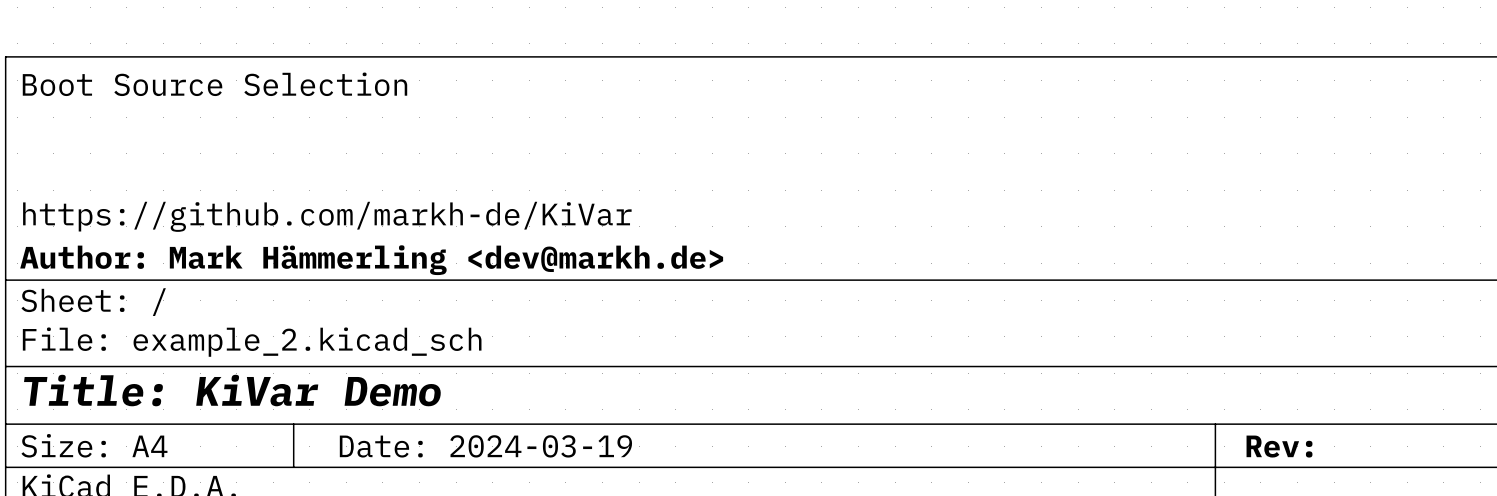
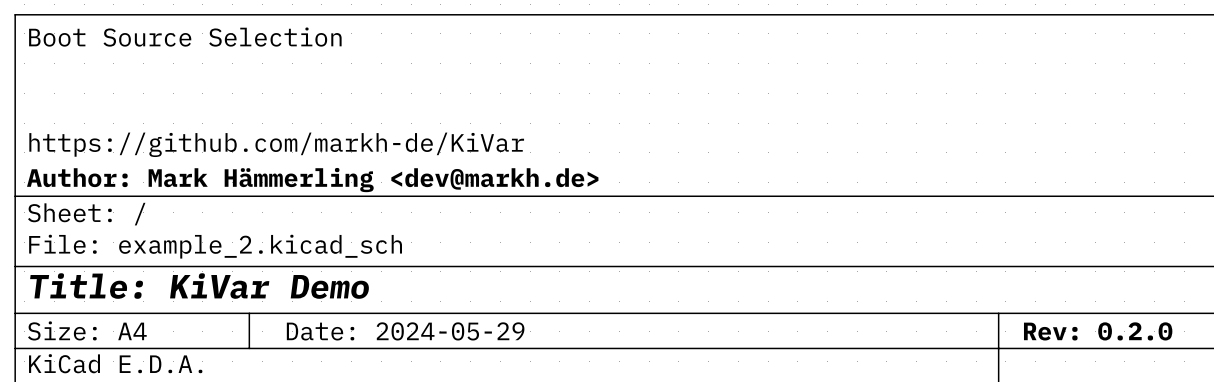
title block: Date: 2024-03-19 (485, 446) -> Date: 2024-05-29 (405, 331)
title block: Rev: (1279, 446) -> Rev: 0.2.0 (1098, 331)

